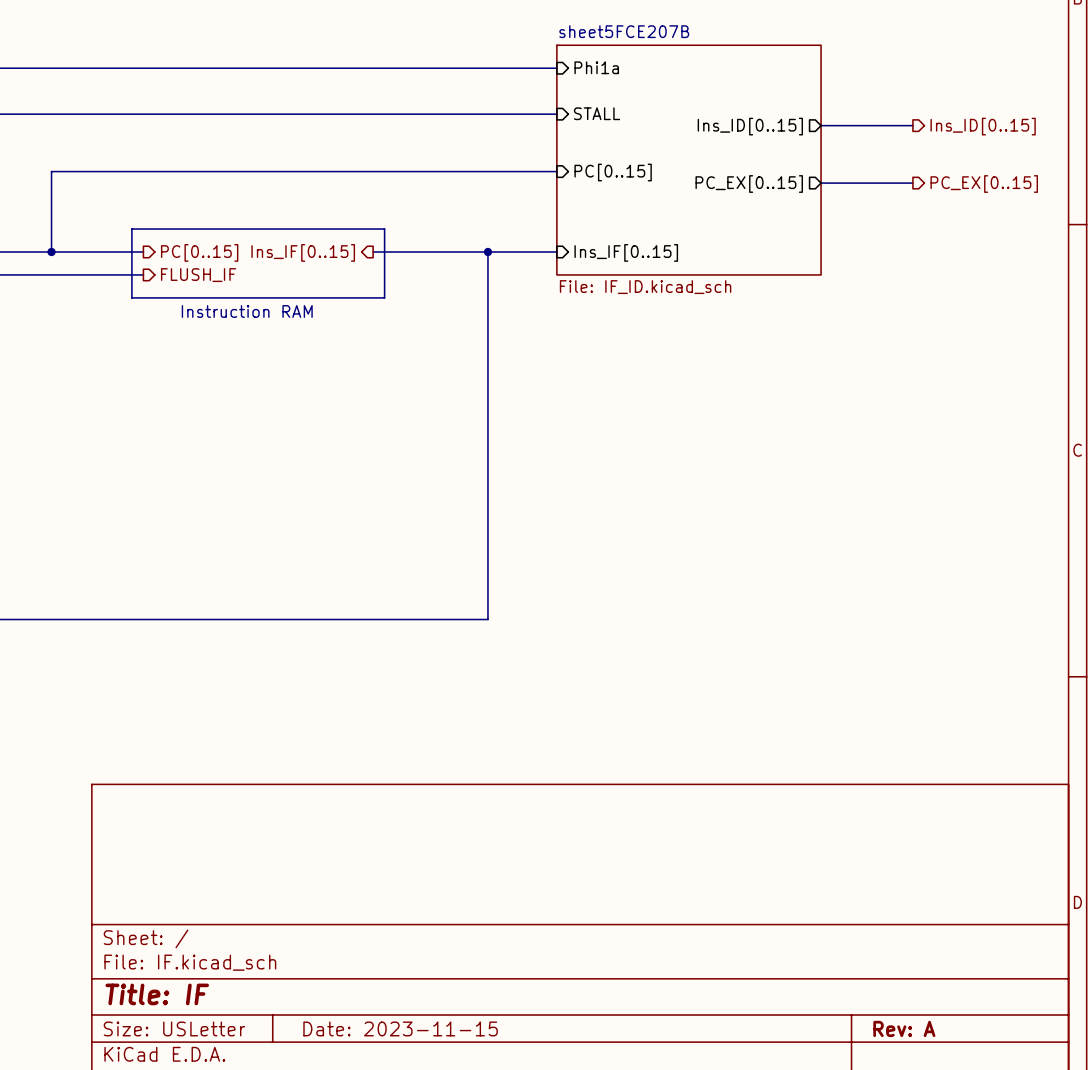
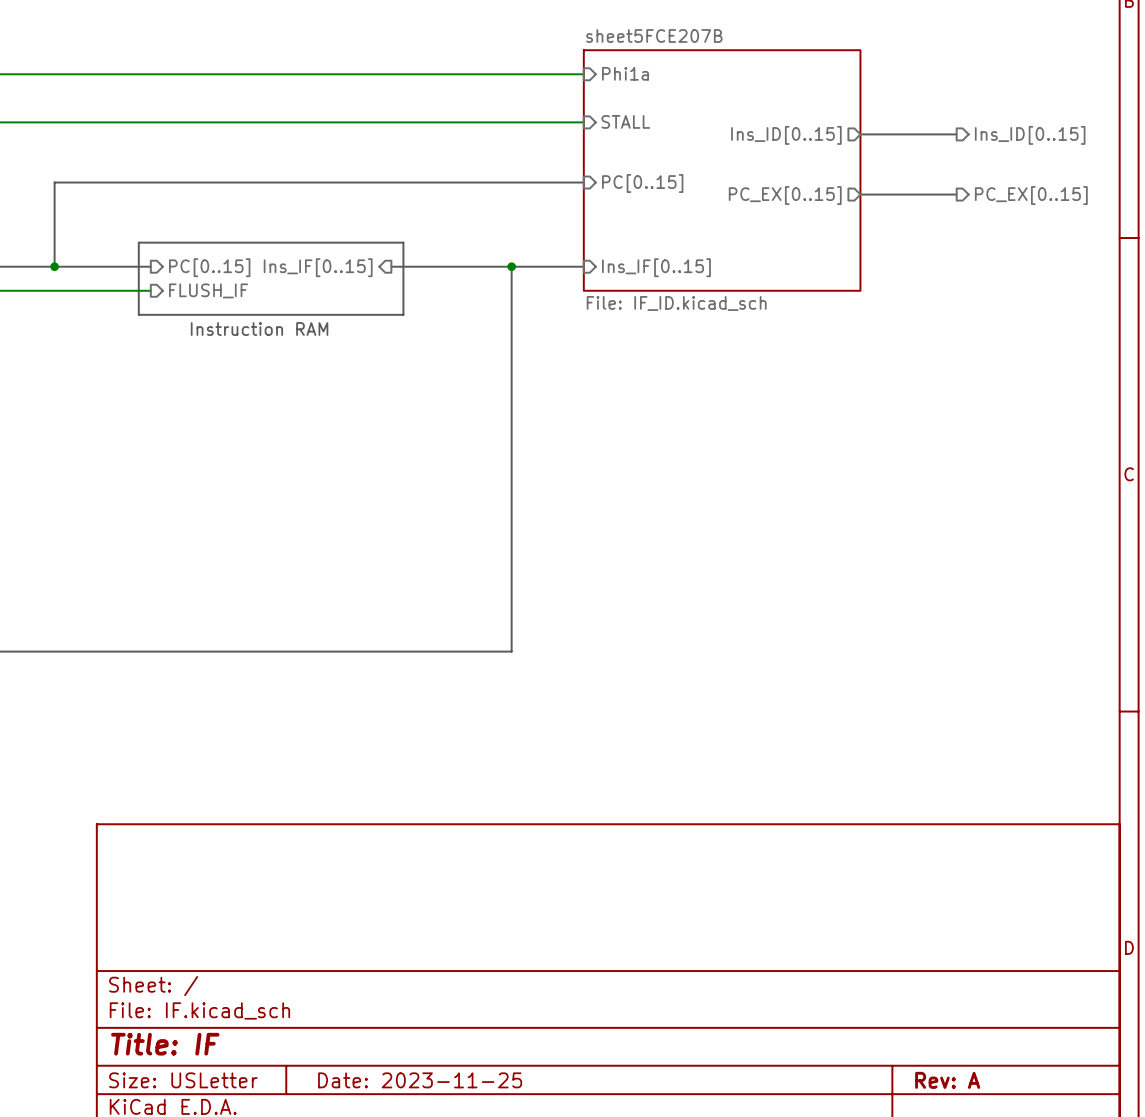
title block: Date: 2023-11-15 (400, 1028) -> Date: 2023-11-25 (420, 1080)

